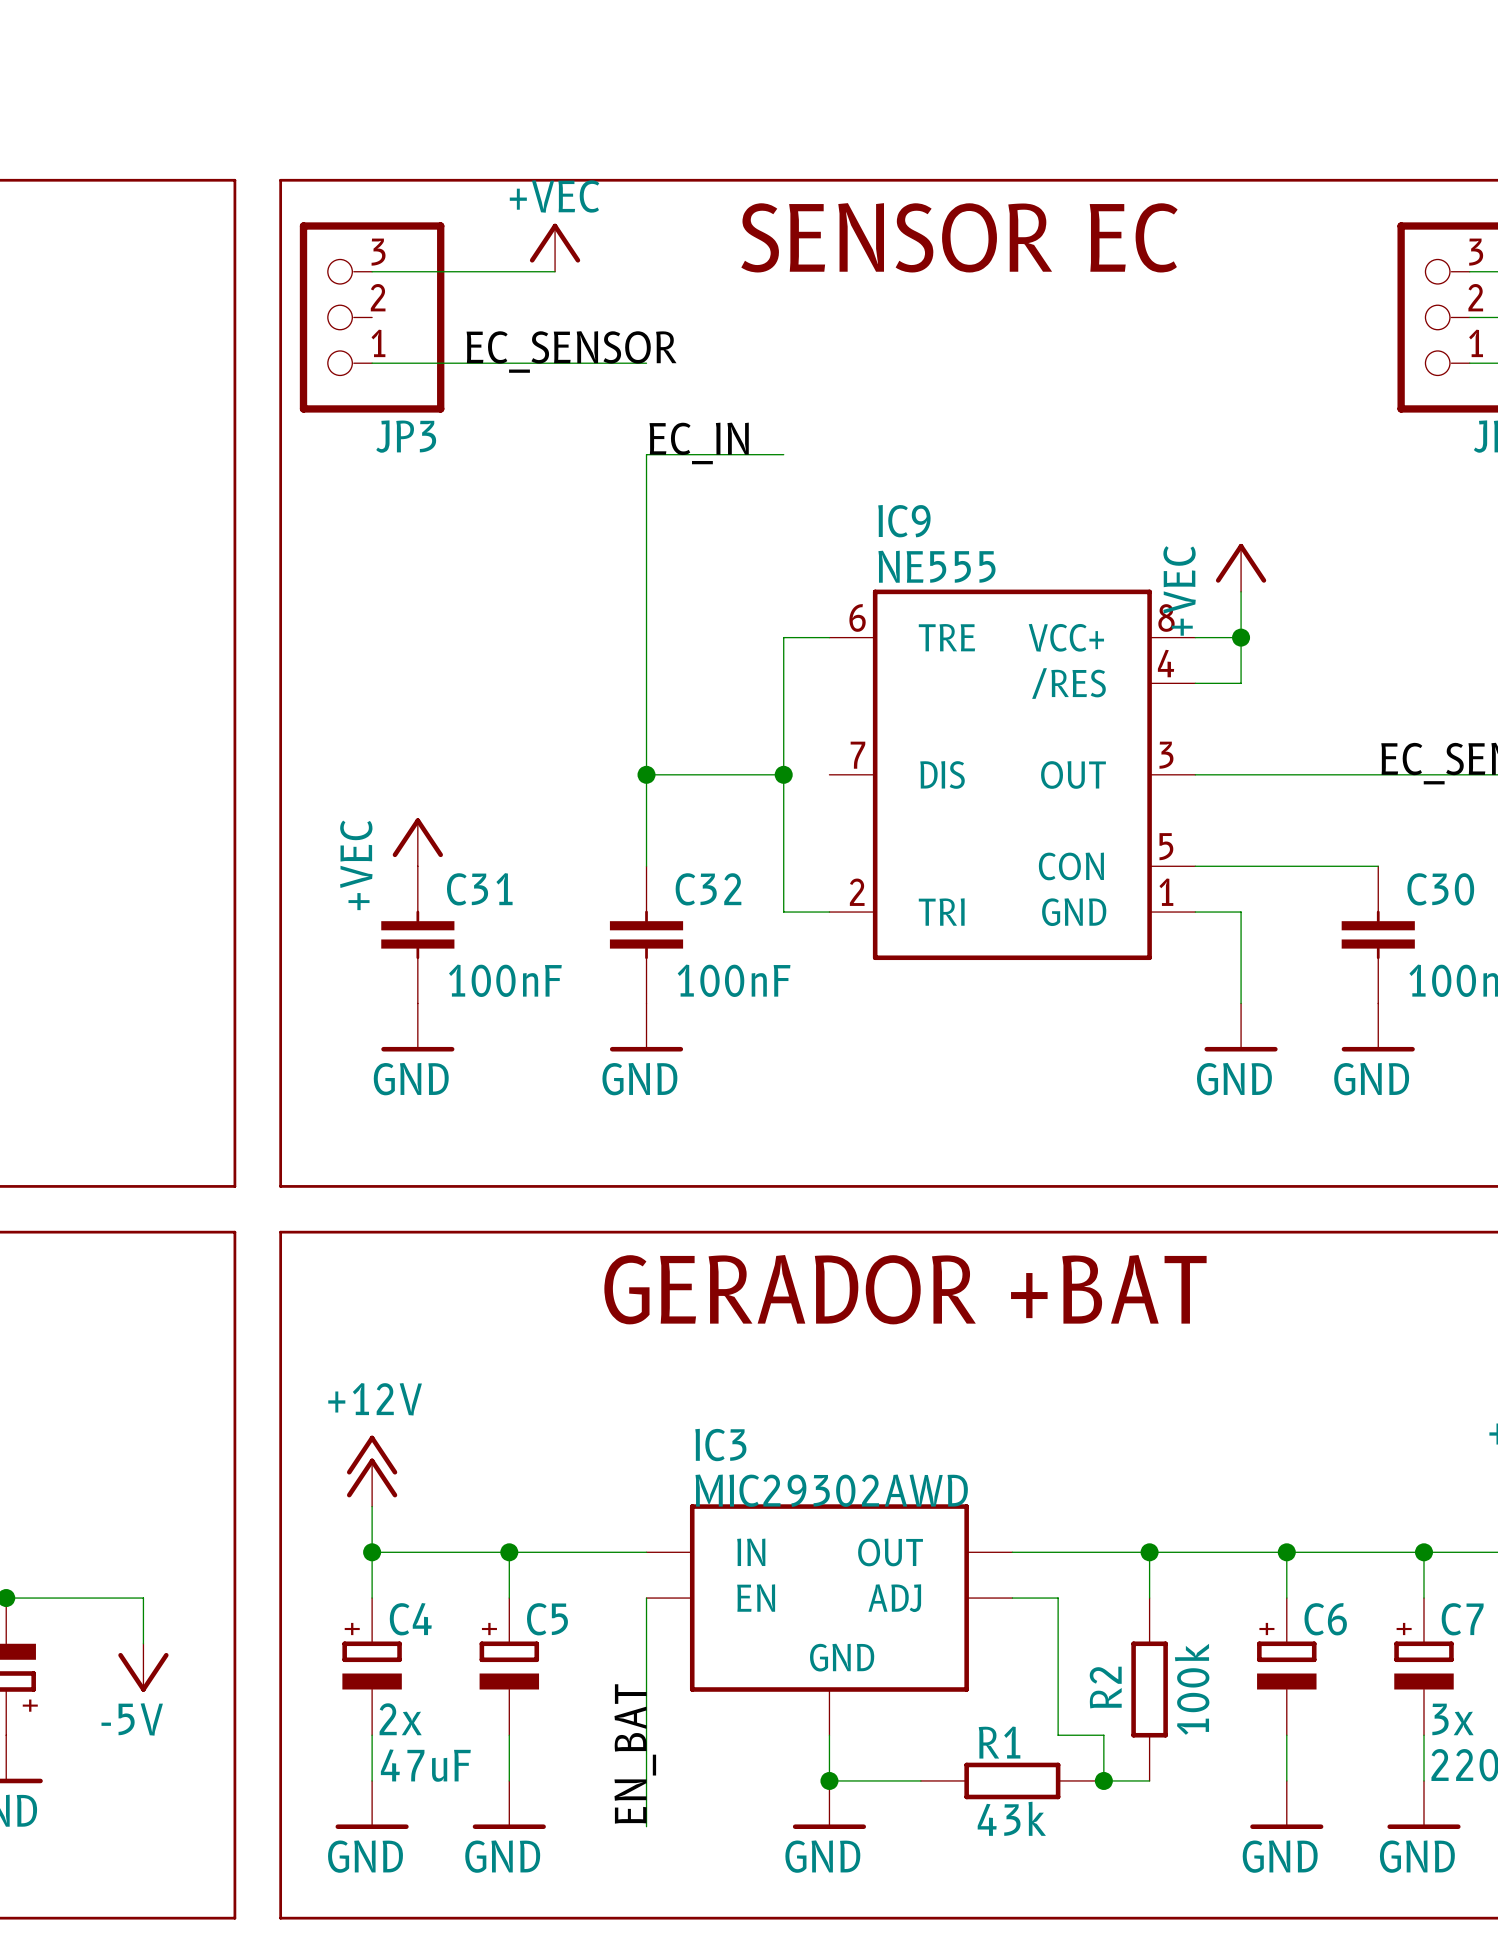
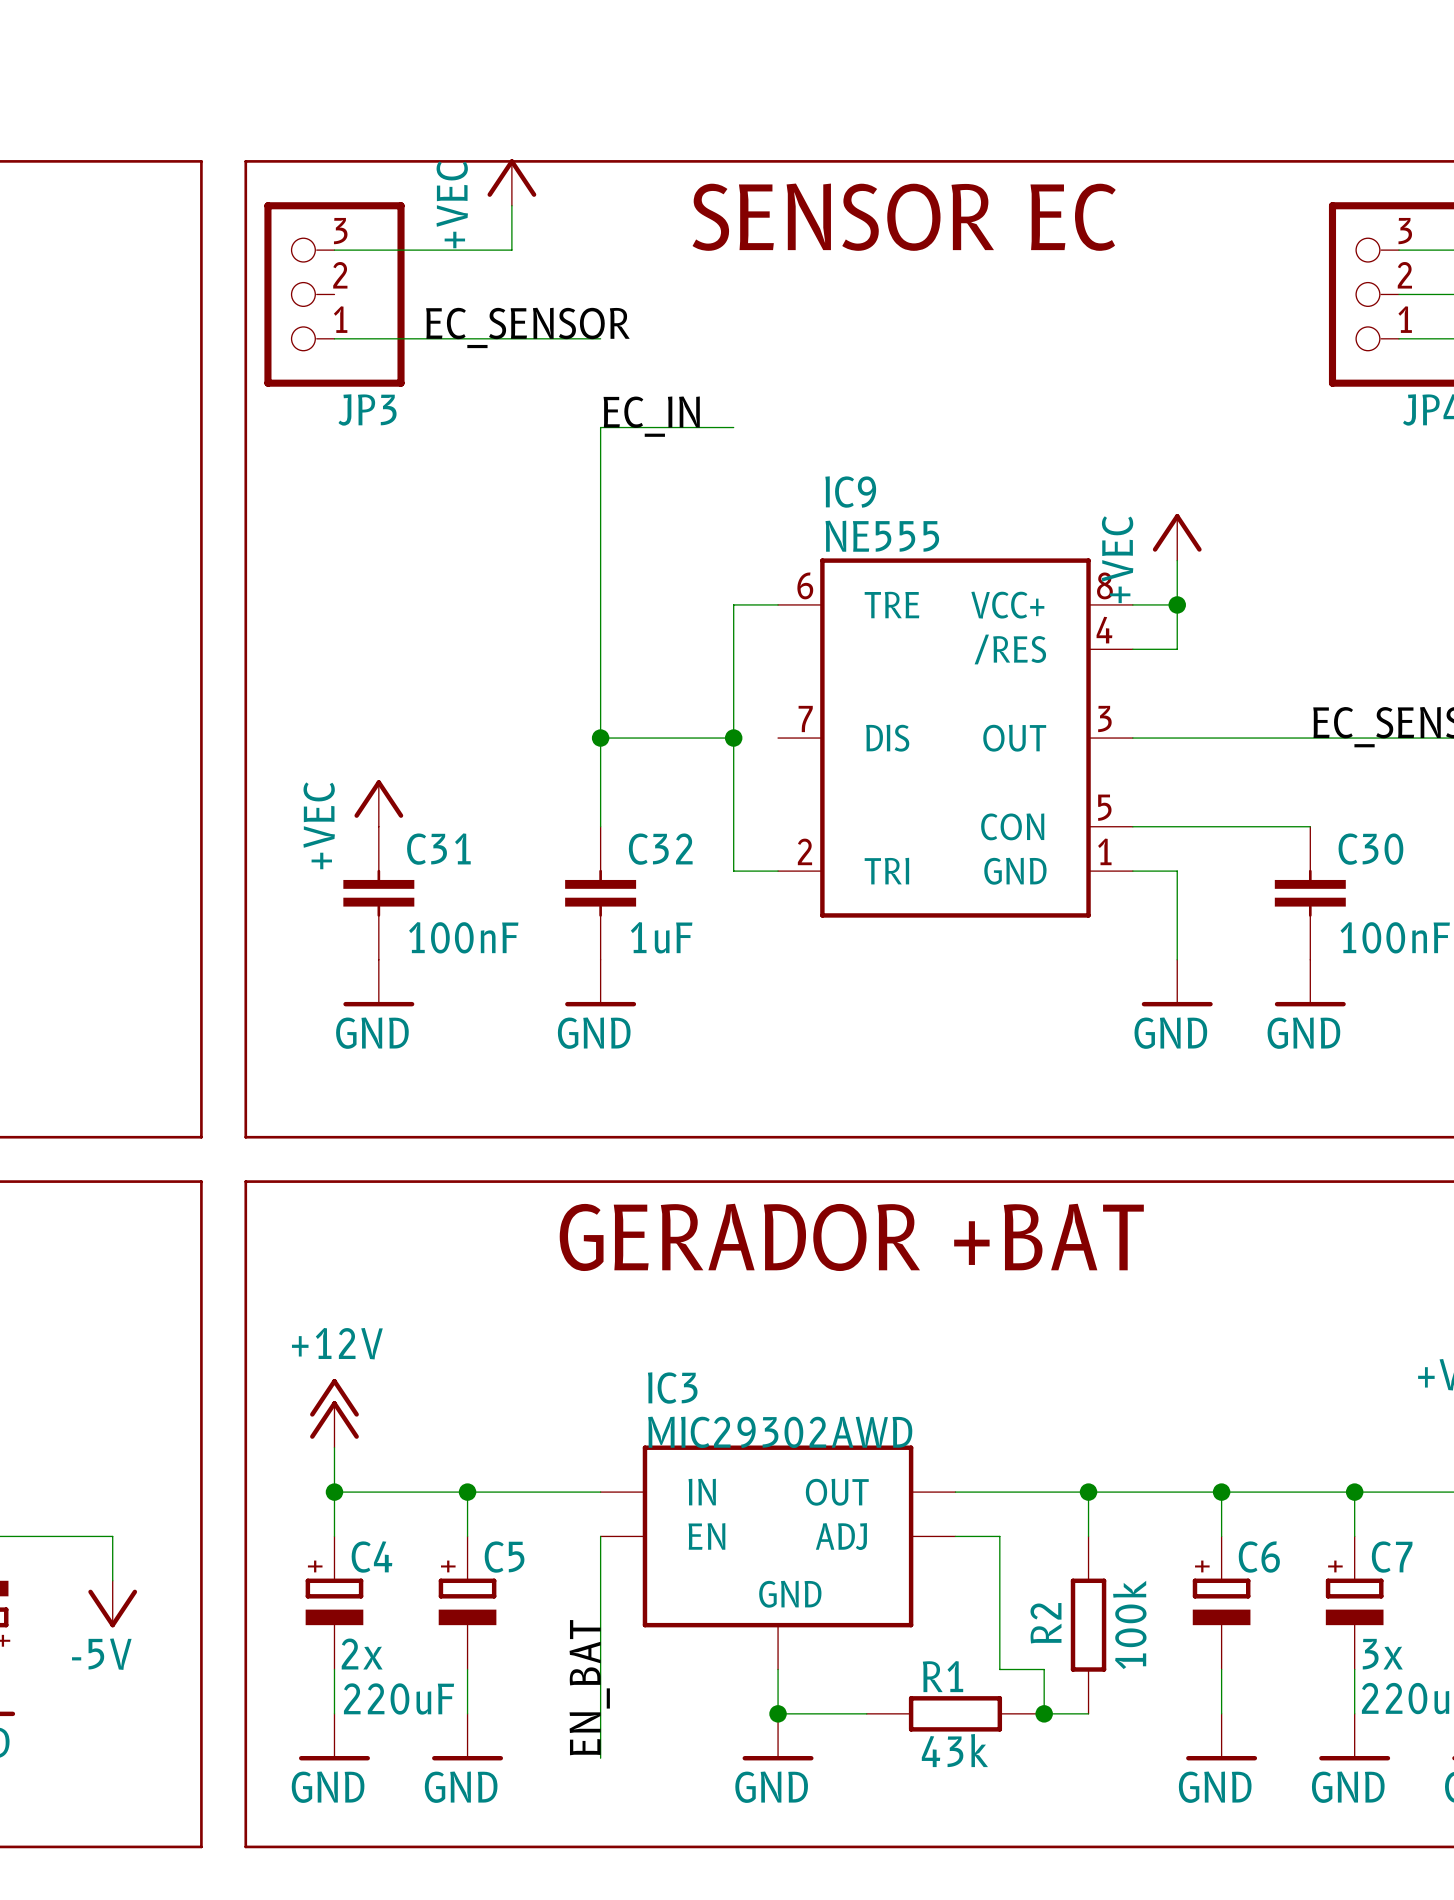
power symbol text rotation: 0° (554, 196) -> 90° counterclockwise (452, 204)
power symbol position: +VEC (555, 247) -> +VEC (511, 182)
C32 value: 100nF (734, 980) -> 1uF (661, 937)
C4 value: 47uF (425, 1765) -> 220uF (399, 1698)

